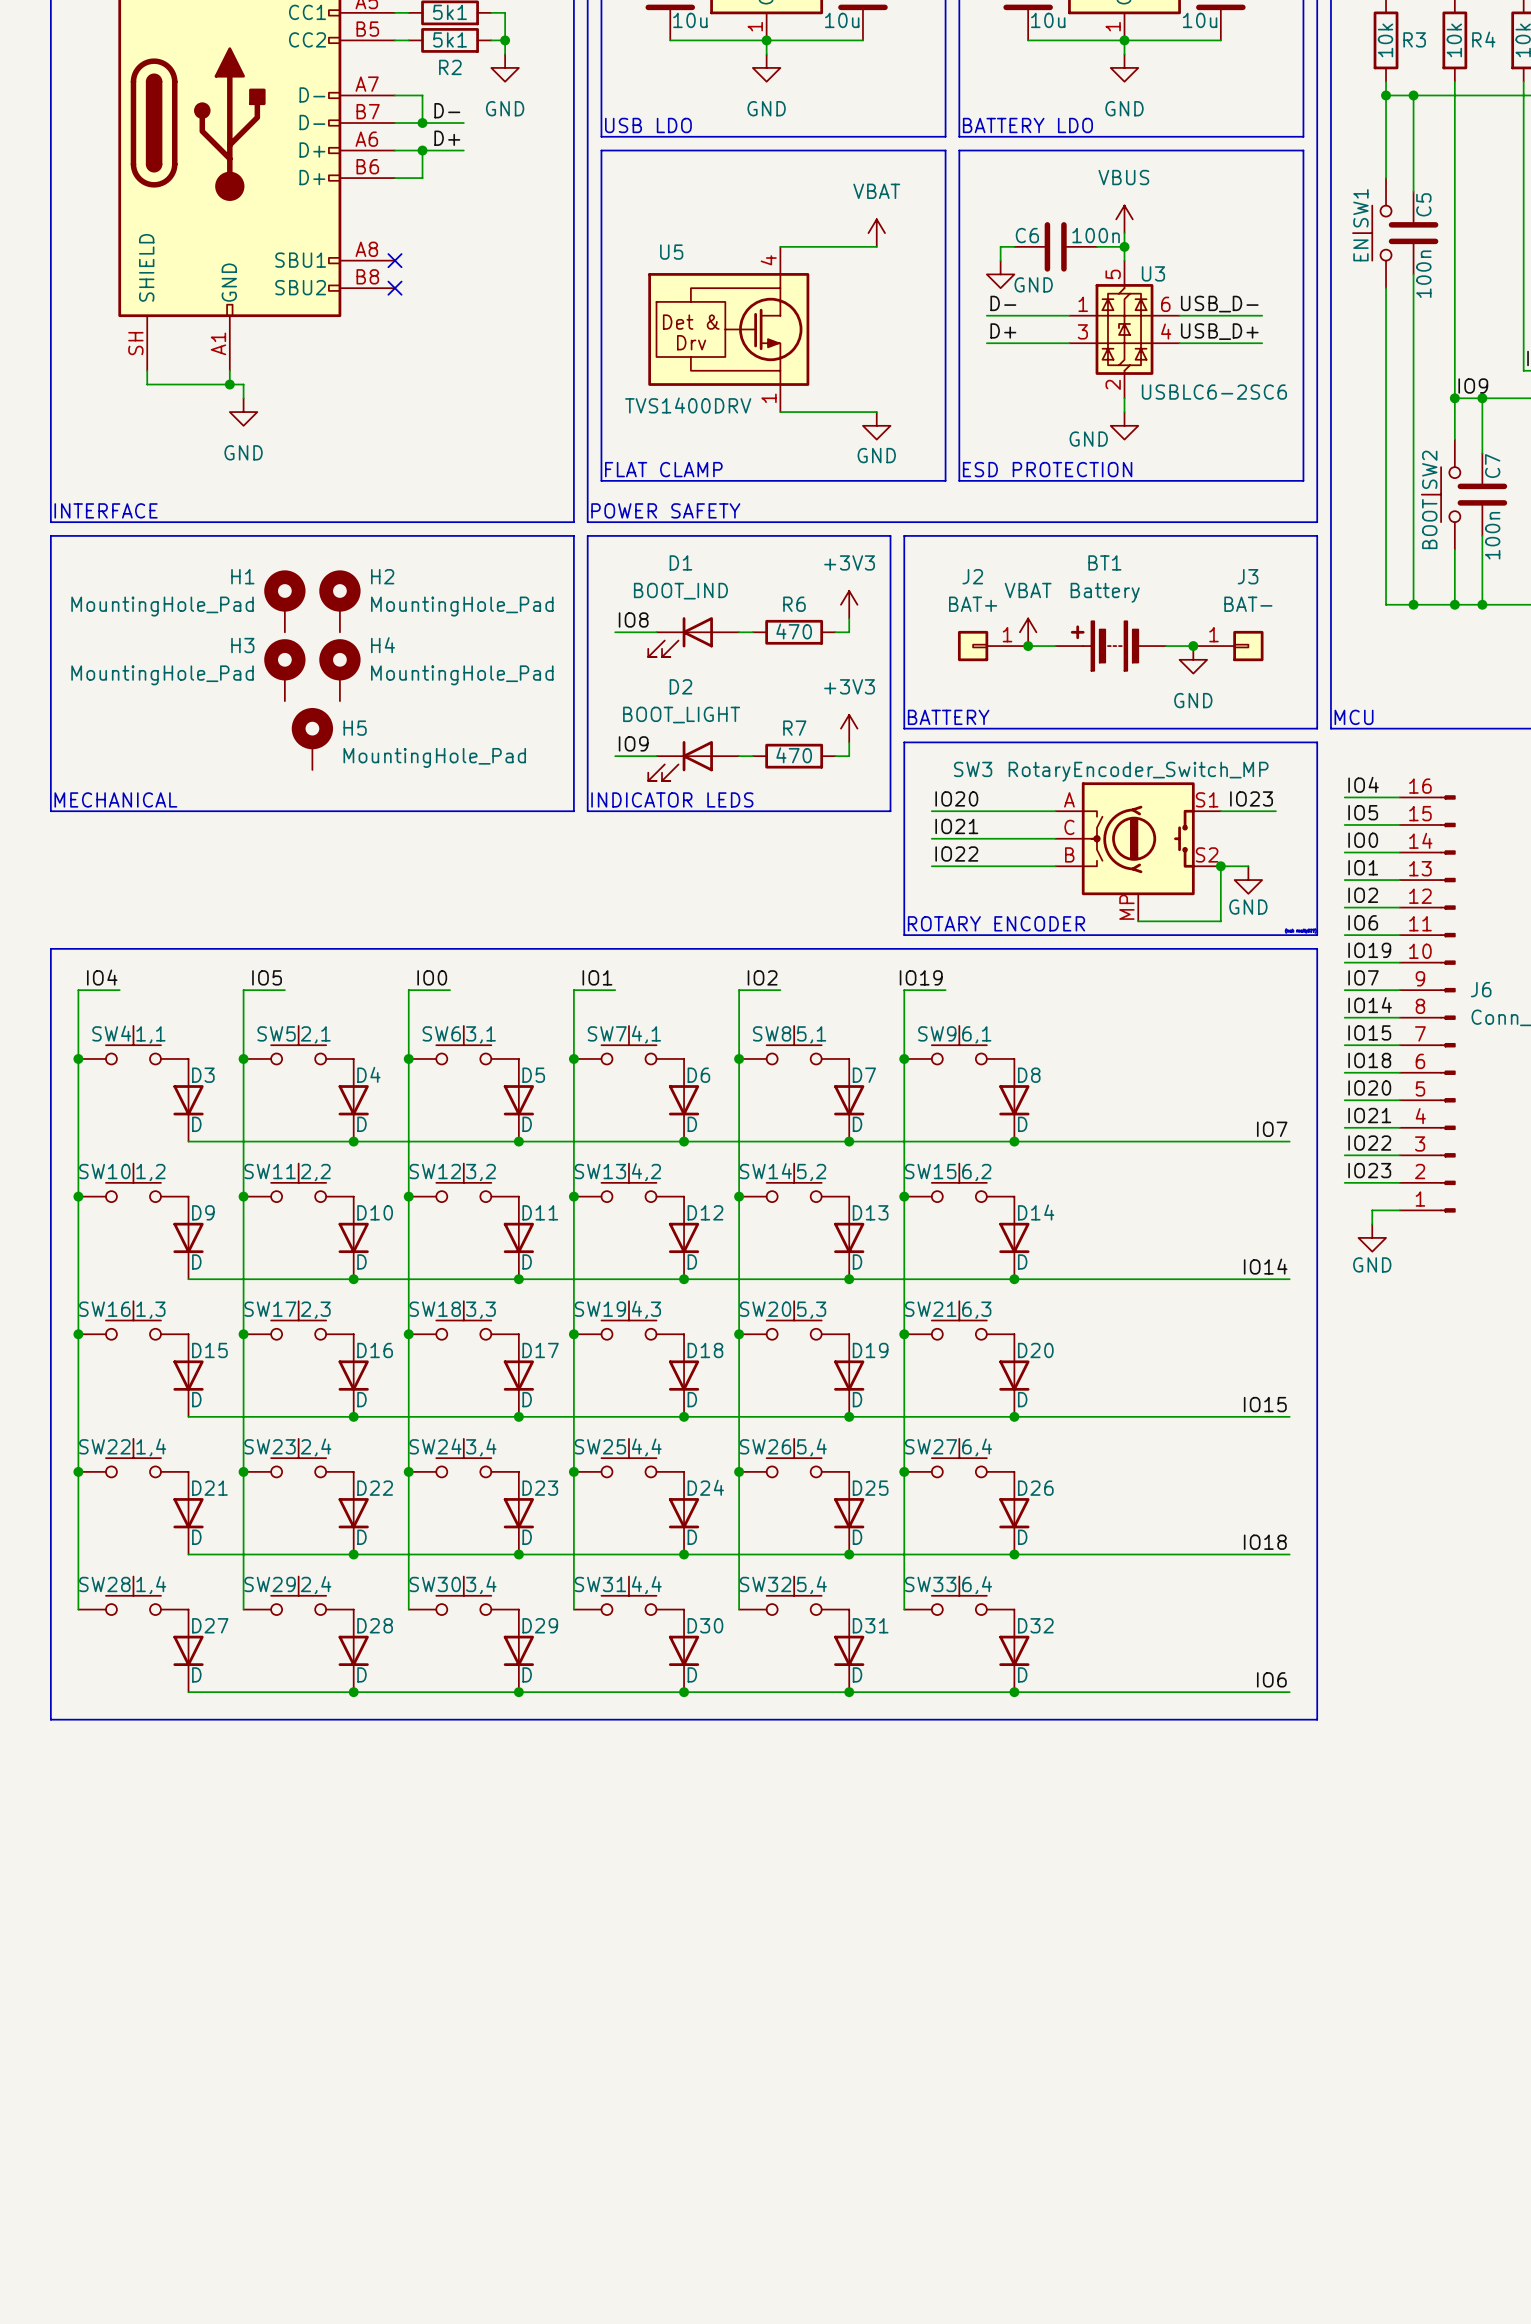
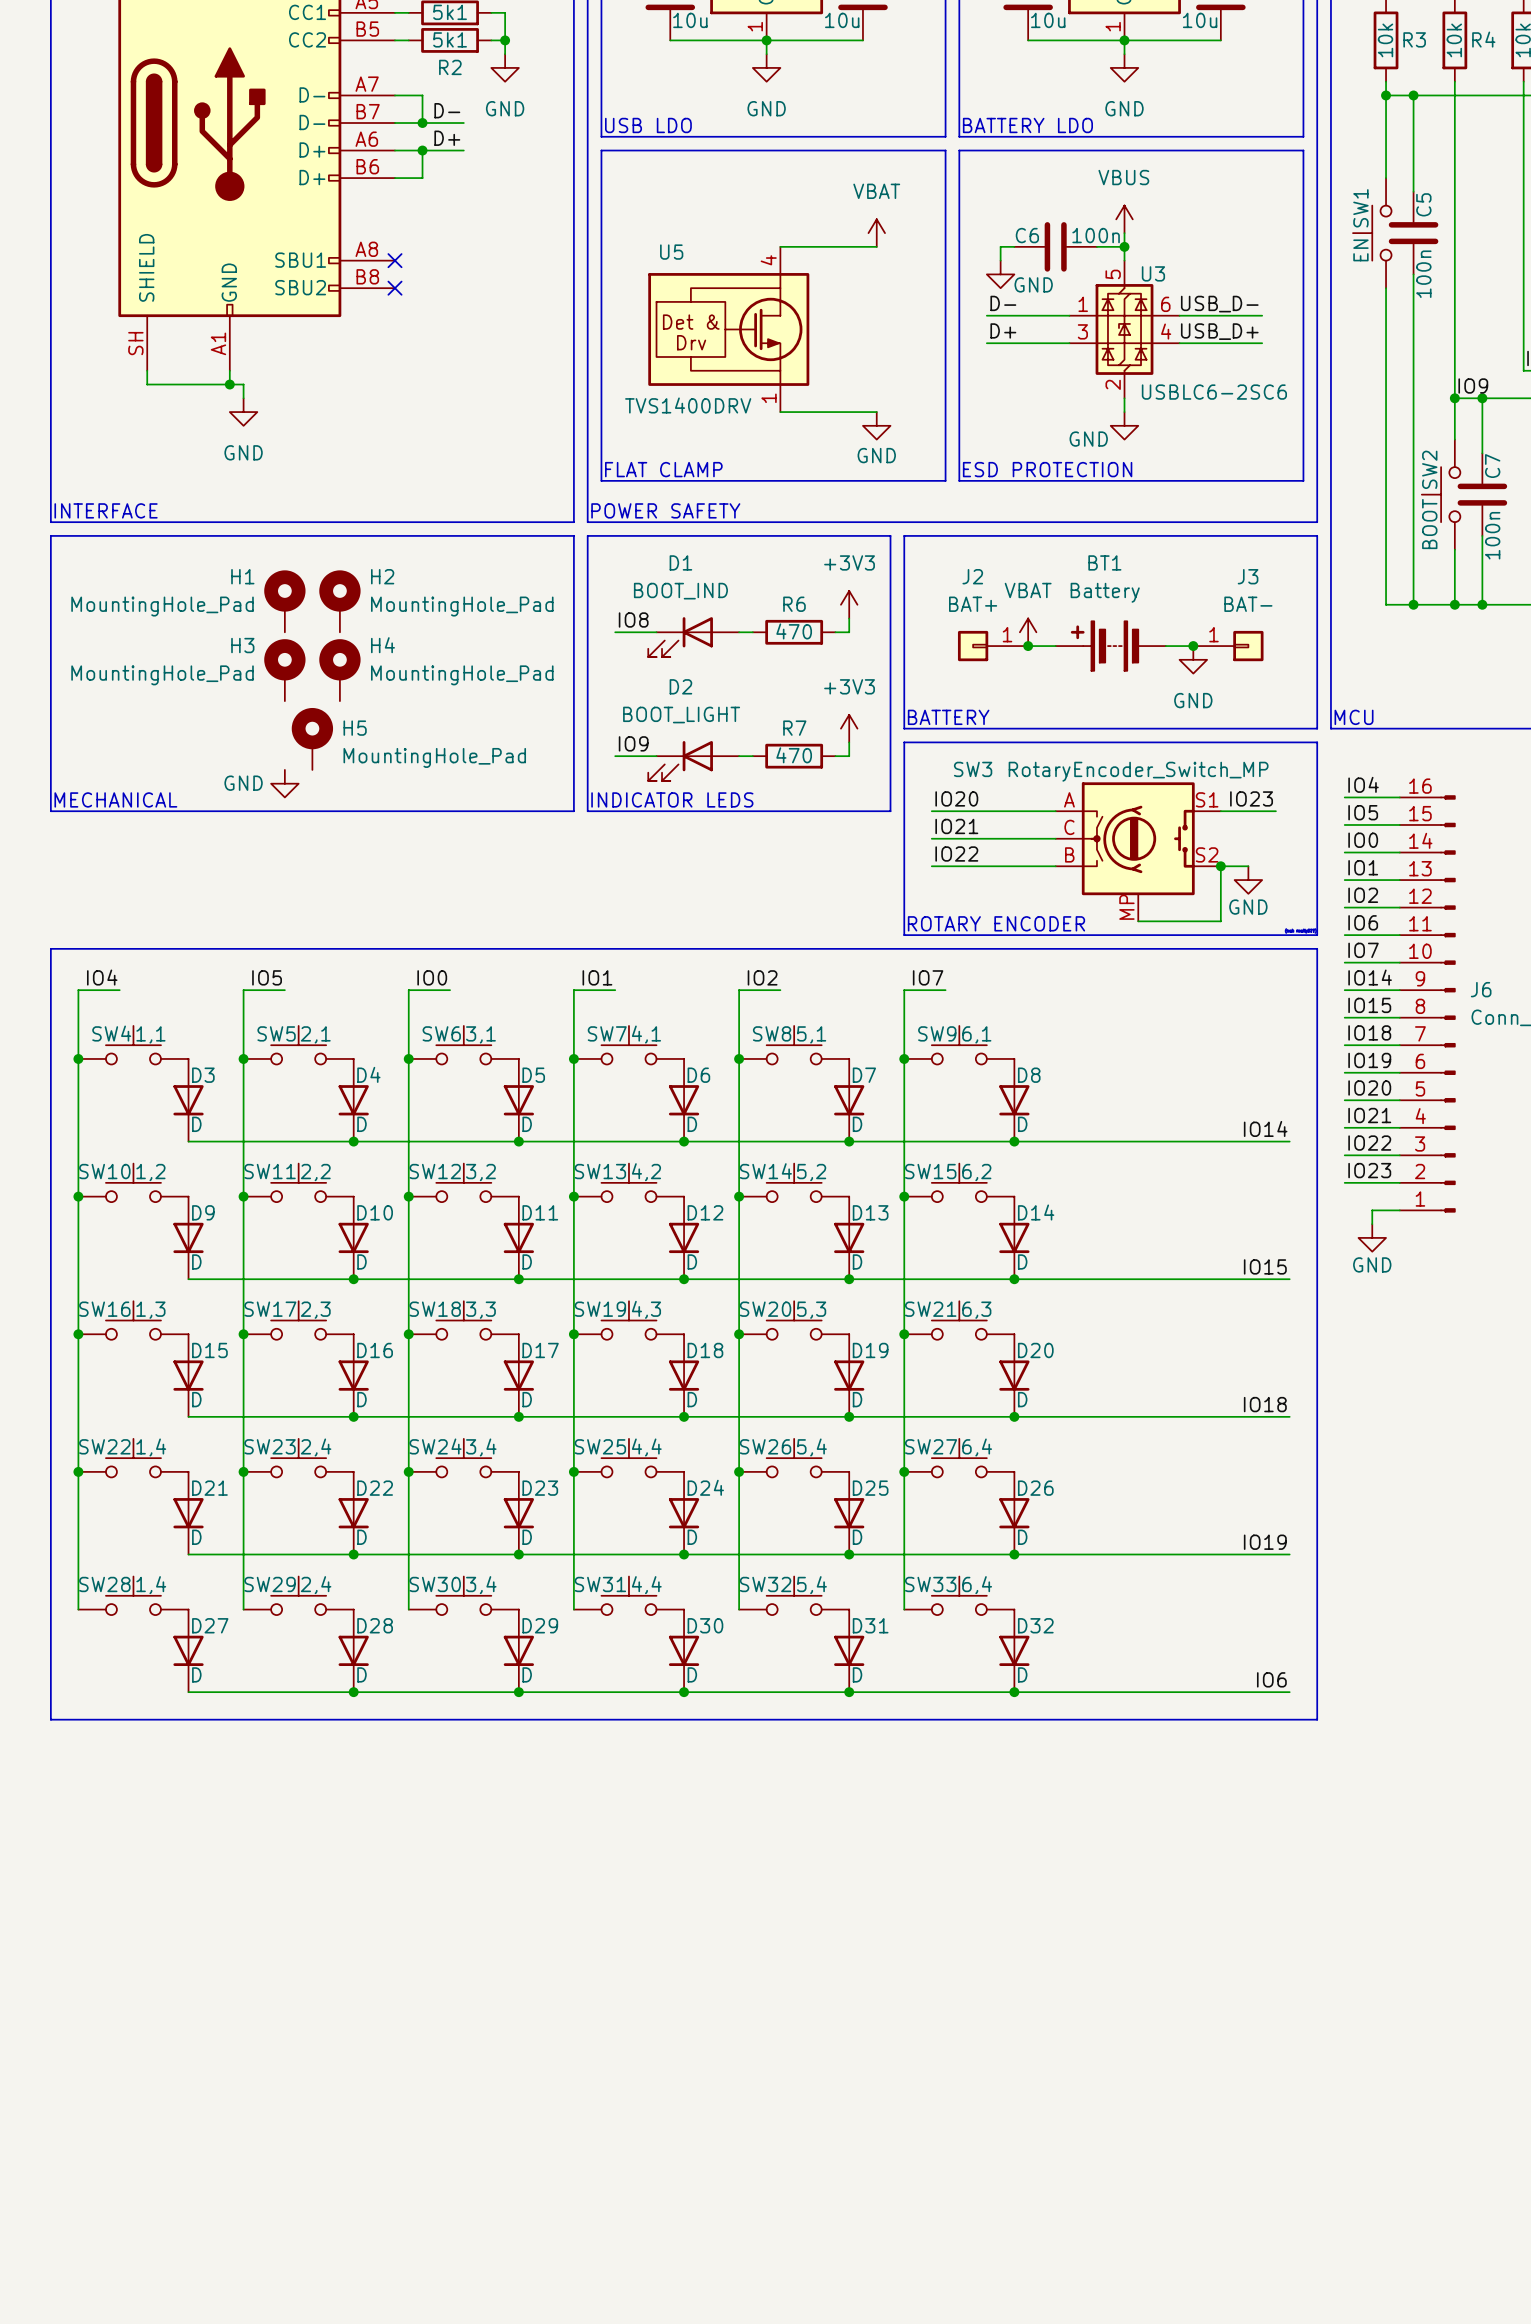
power symbol: none -> GND (284, 783)
label: IO19 (1369, 950) -> IO7 (1363, 950)
label: IO19 (921, 977) -> IO7 (928, 977)
label: IO7 (1363, 977) -> IO14 (1370, 977)
label: IO14 (1370, 1005) -> IO15 (1369, 1005)
label: IO15 (1369, 1032) -> IO18 (1369, 1032)
label: IO18 (1369, 1060) -> IO19 (1369, 1060)
label: IO7 (1272, 1129) -> IO14 (1265, 1128)
label: IO14 (1265, 1266) -> IO15 (1265, 1266)
label: IO15 (1265, 1404) -> IO18 (1265, 1404)
label: IO18 (1265, 1542) -> IO19 (1265, 1542)

